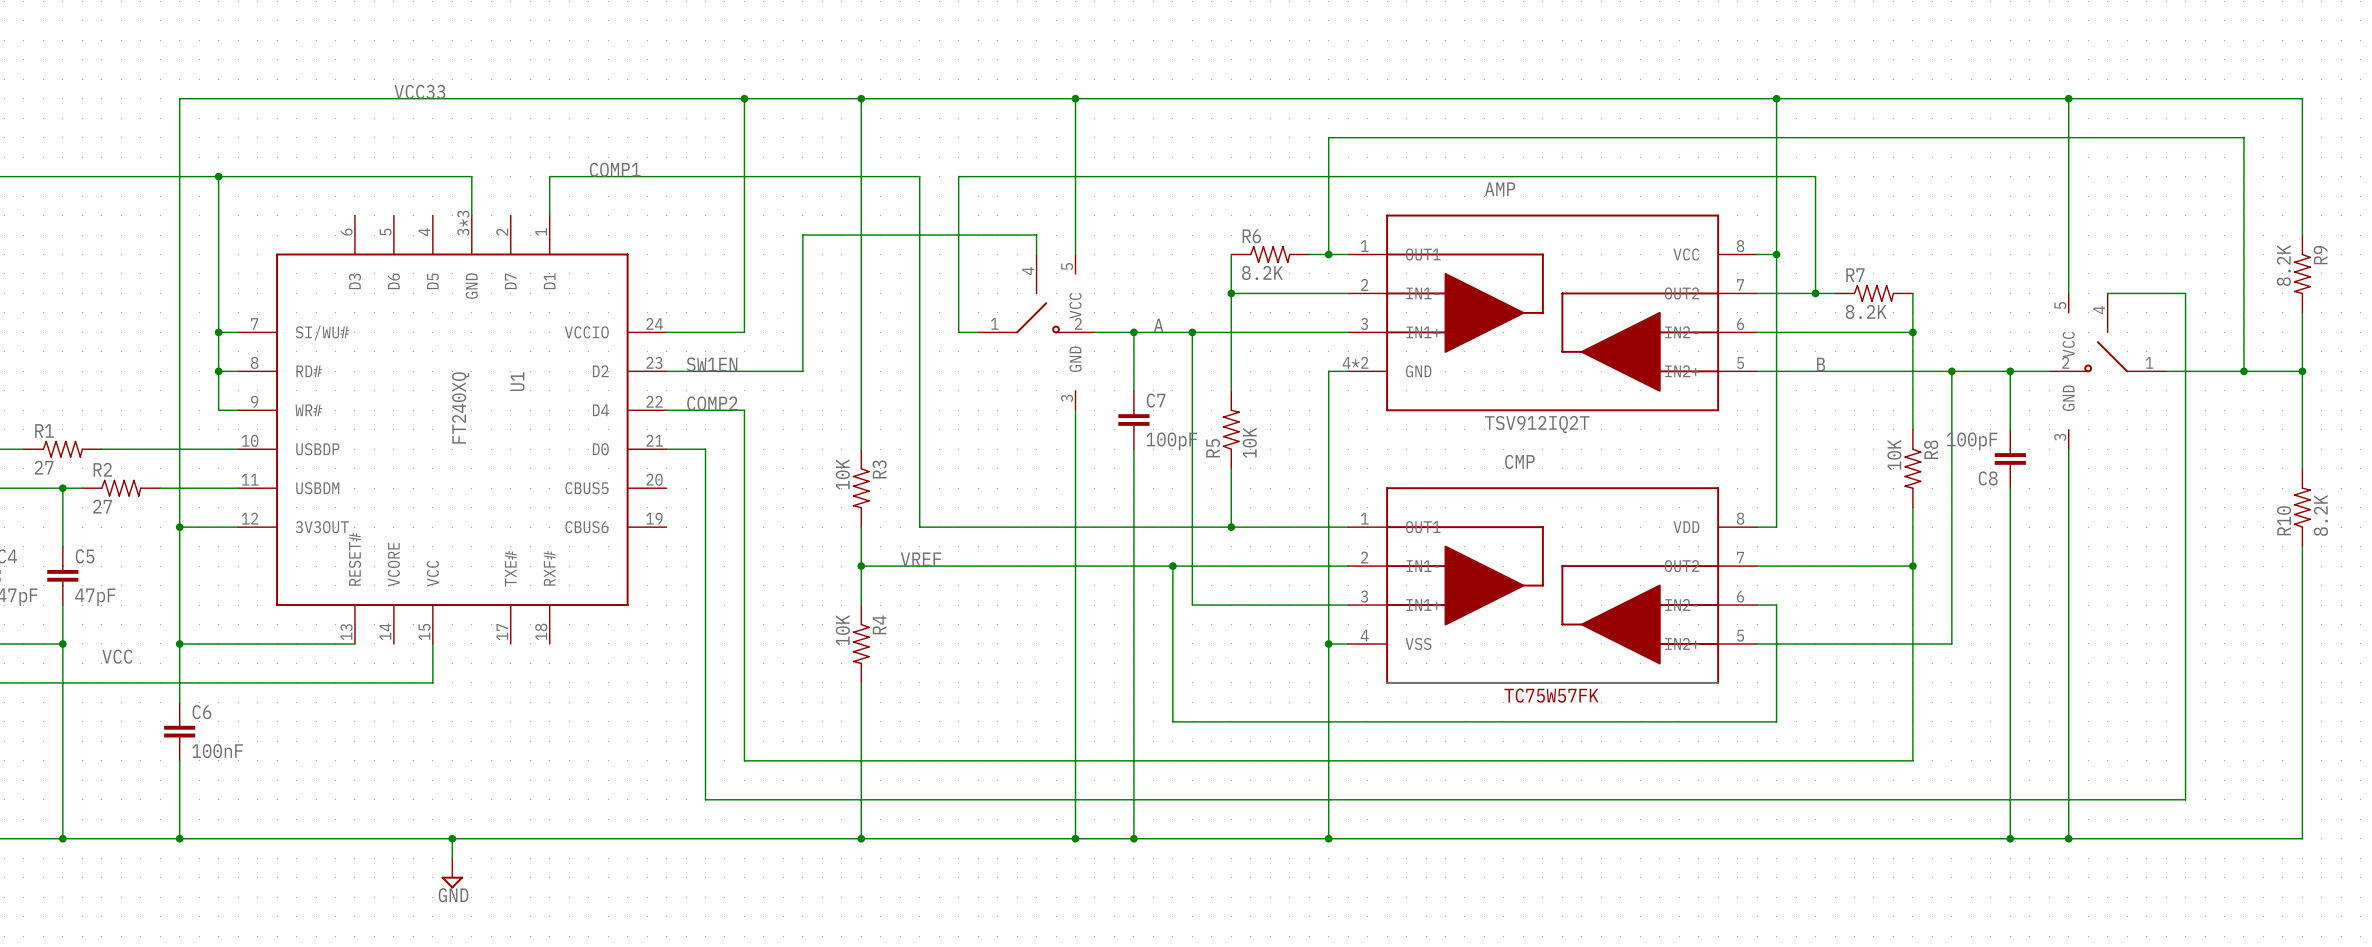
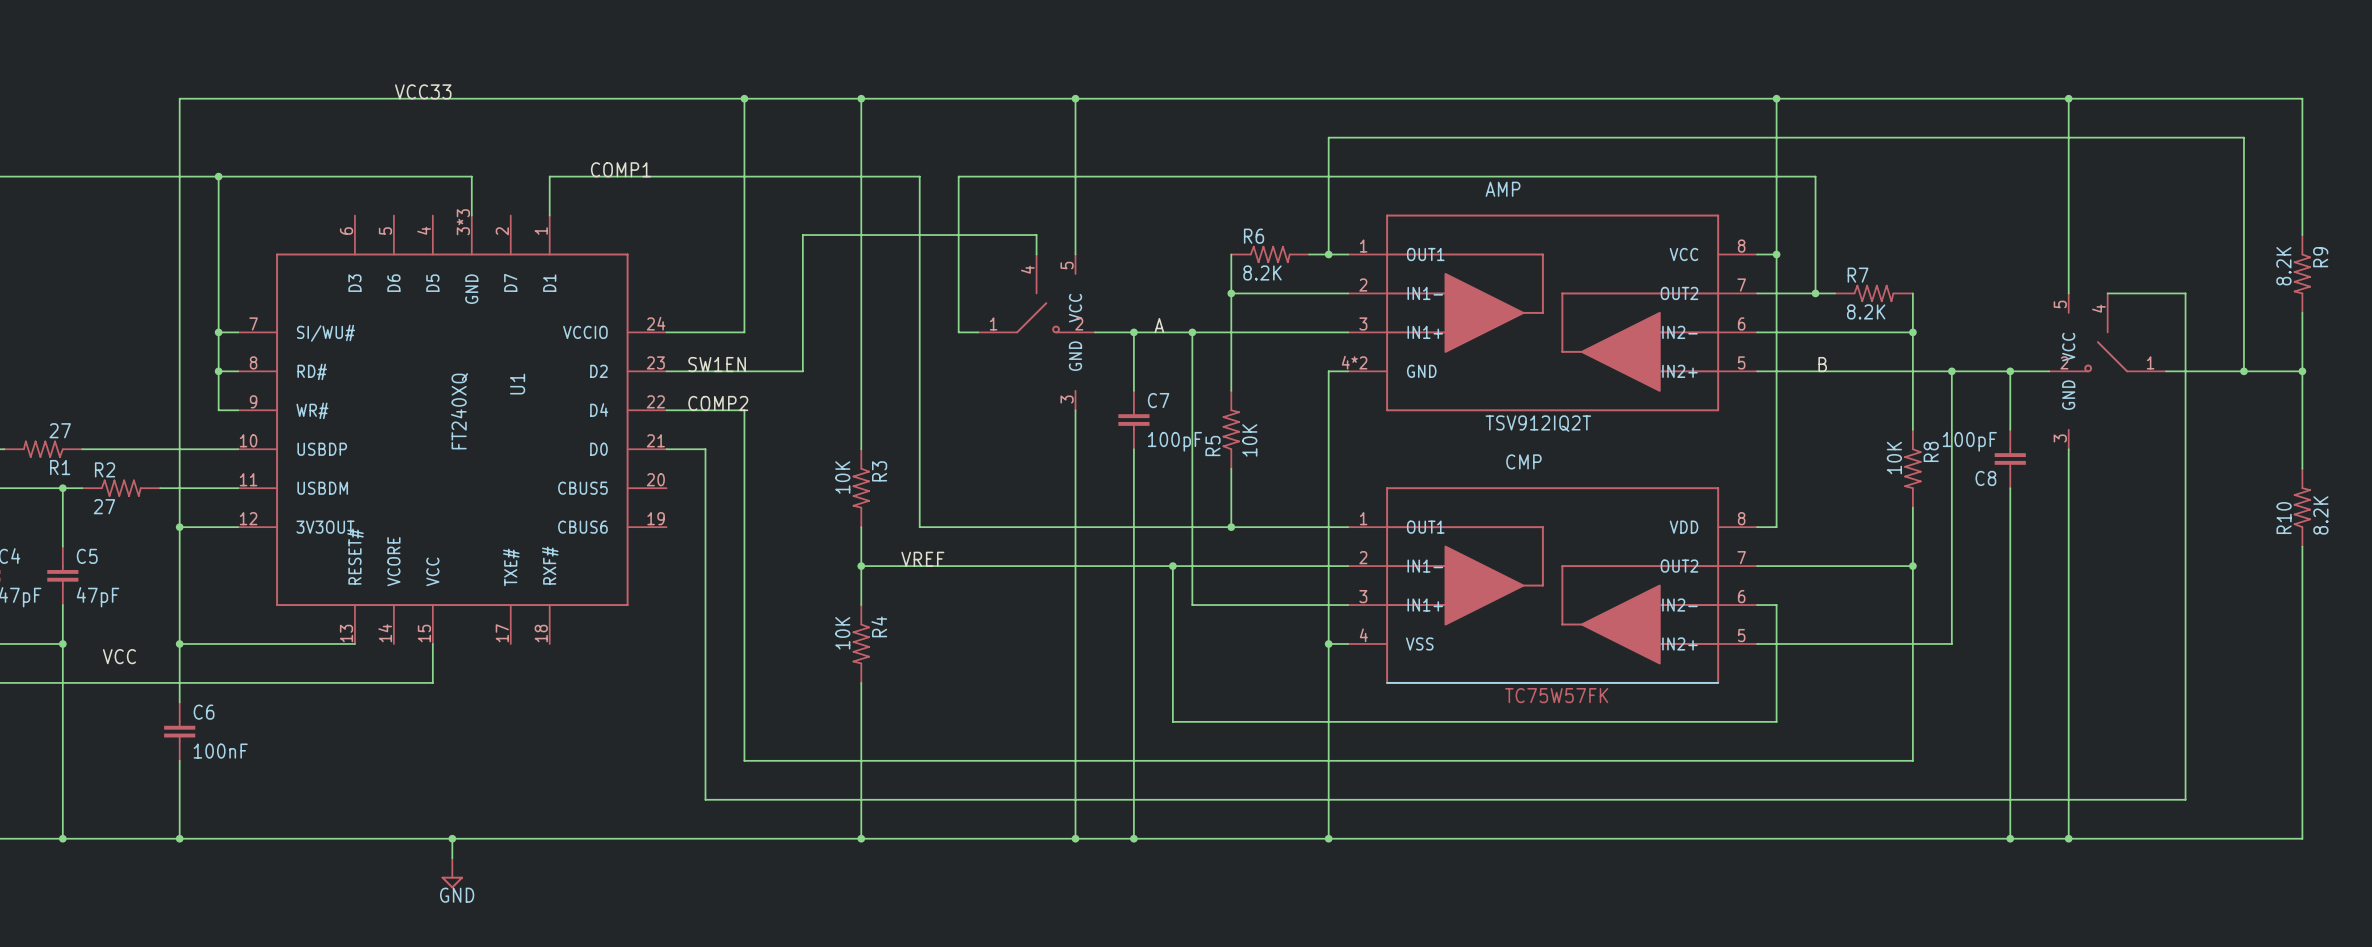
R1 rotation: 0° (62, 449) -> 180° (43, 449)

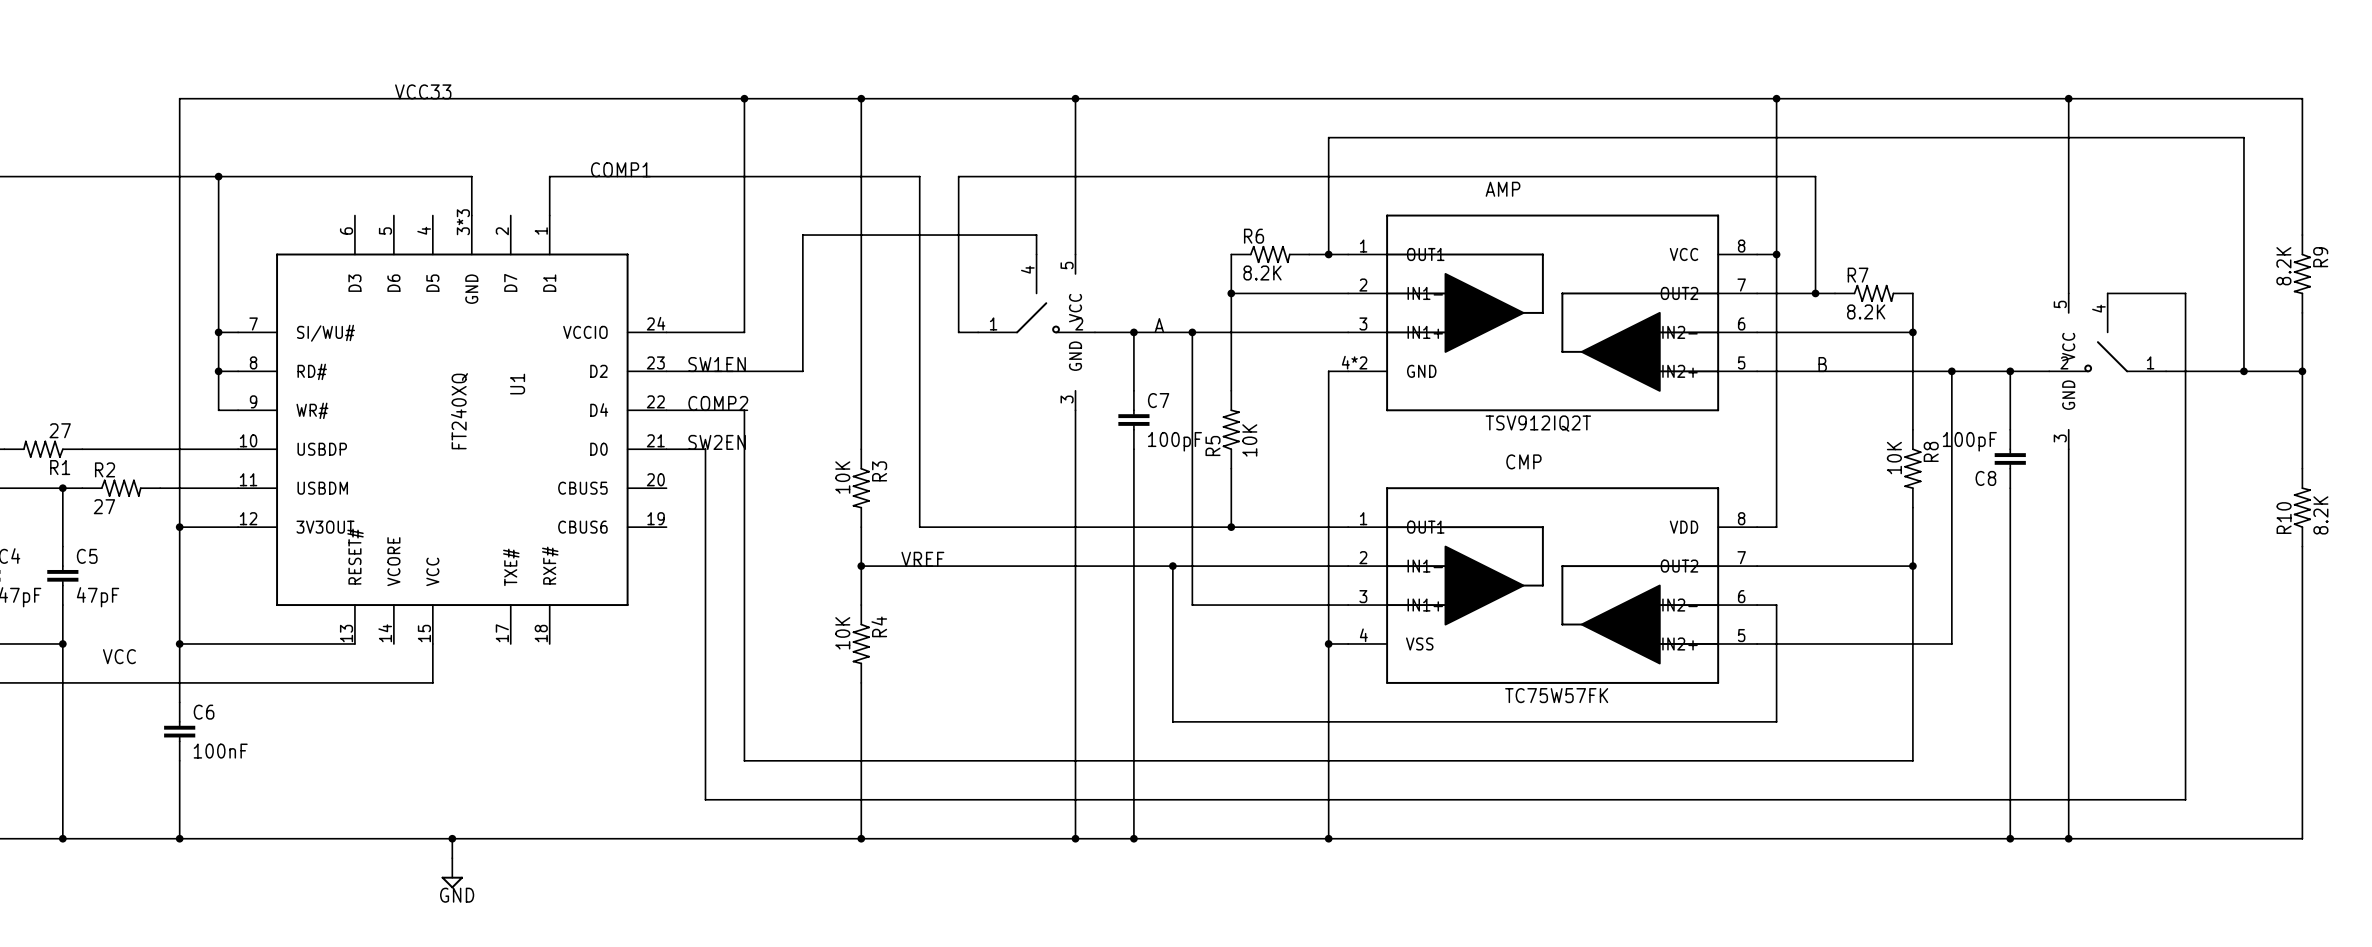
label: none -> SW2EN (717, 442)

